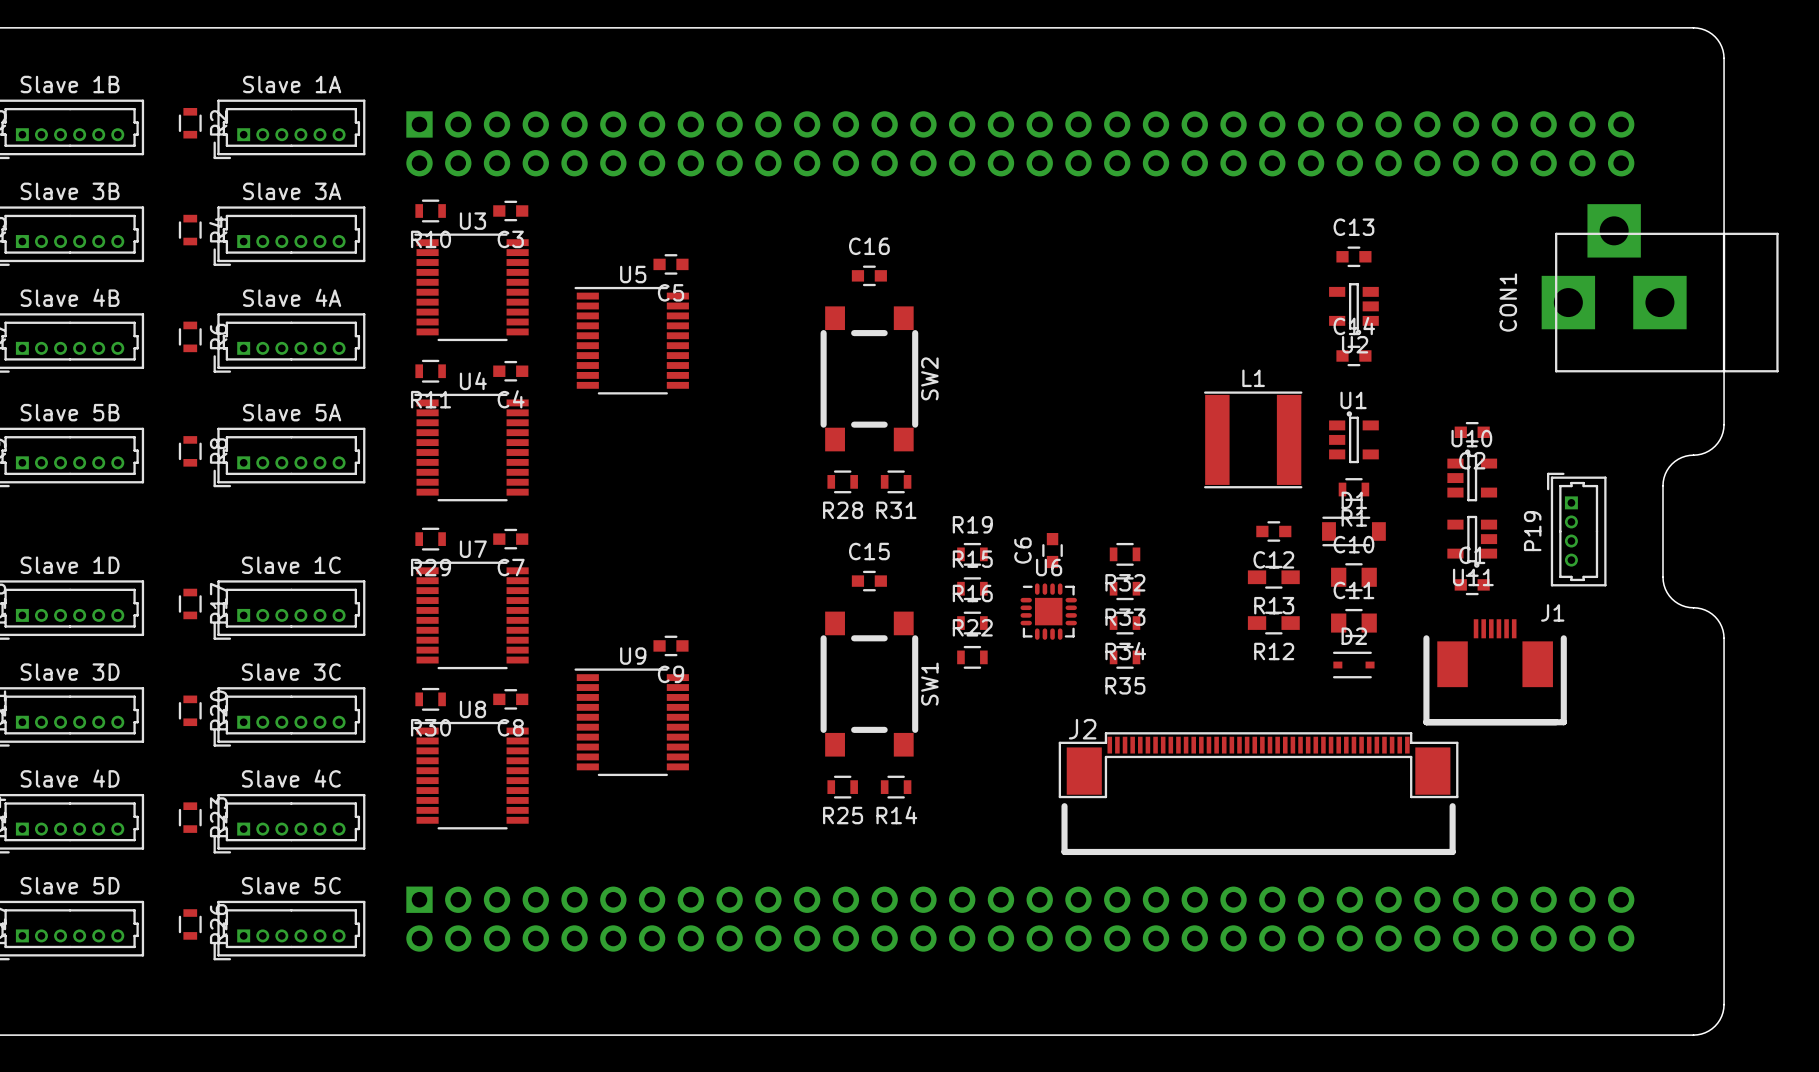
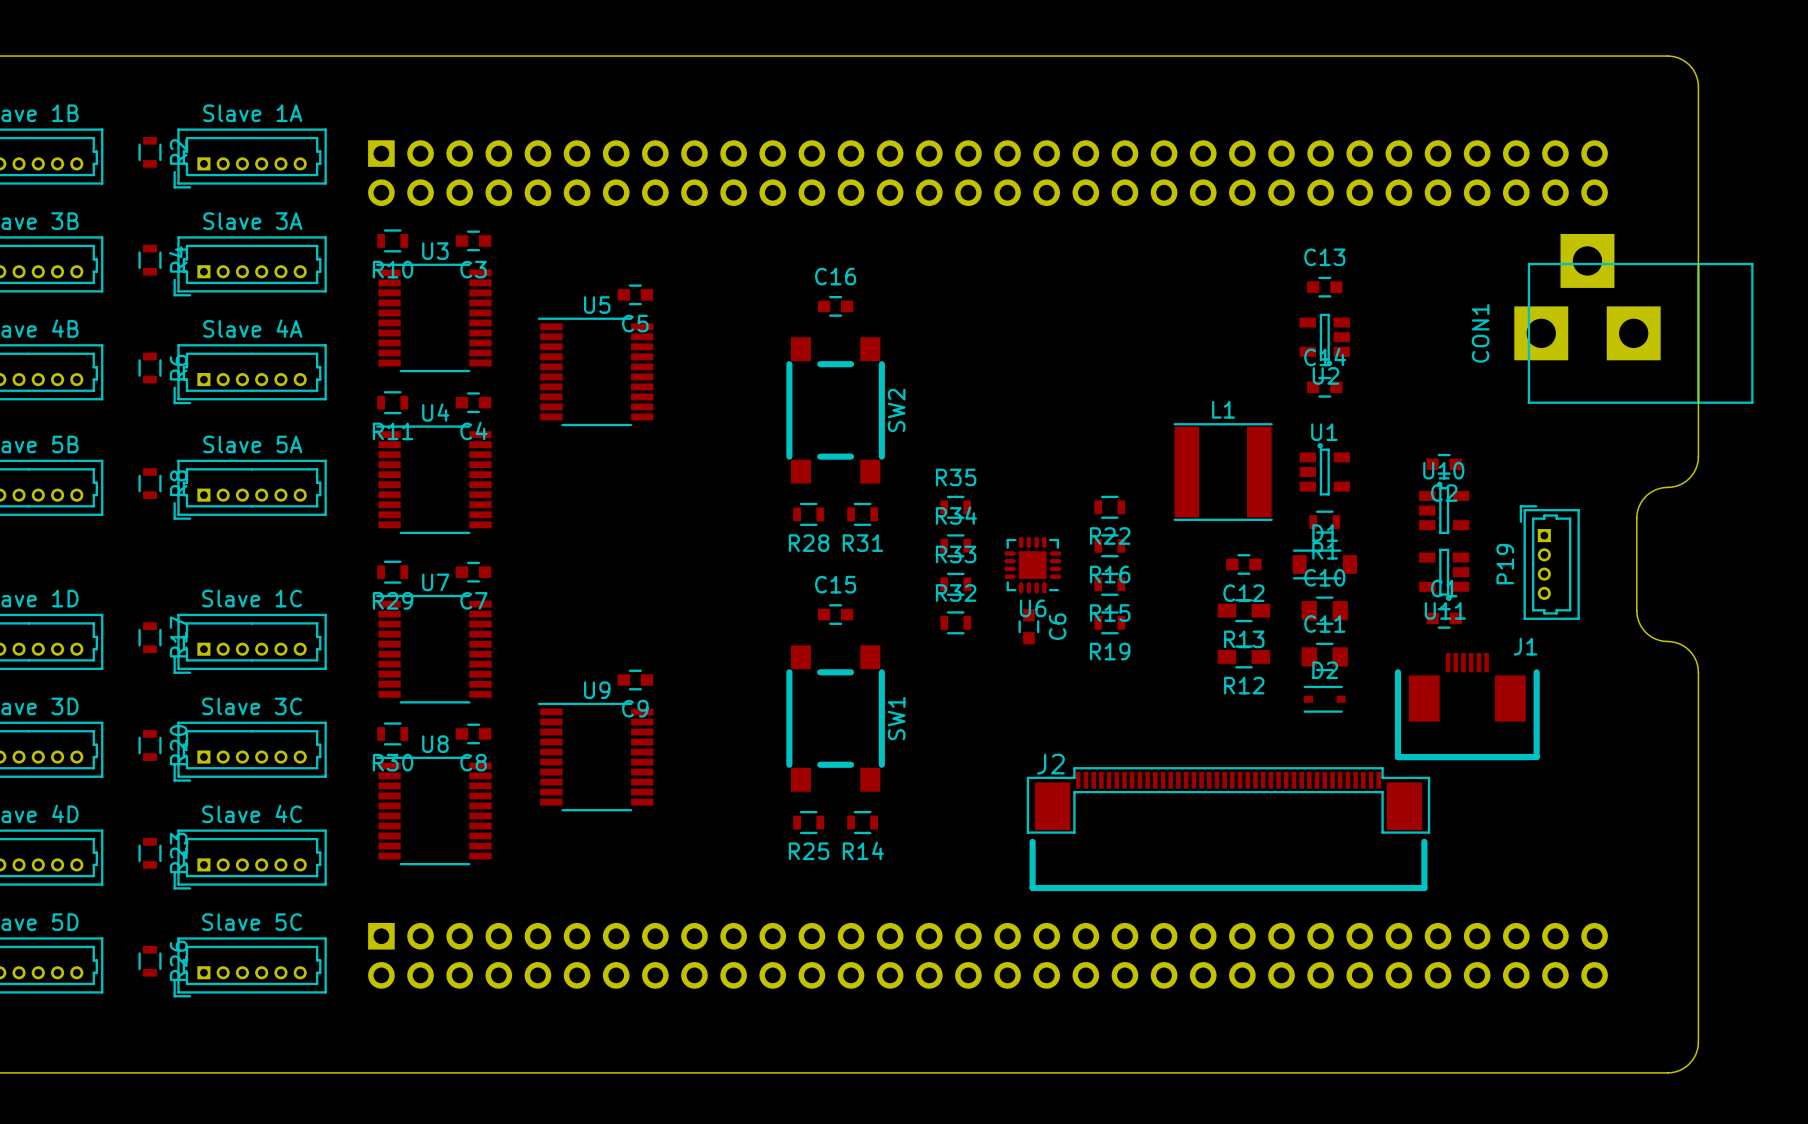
R19 name position: R19 (972, 524) -> R19 (1110, 651)
C6 name position: C6 (1022, 550) -> C6 (1057, 626)
C6 position: (1052, 550) -> (1028, 626)
R19 position: (972, 554) -> (1109, 622)
R32 position: (1125, 554) -> (955, 622)
R15 name position: R15 (972, 559) -> R15 (1110, 613)
R32 name position: R32 (1125, 582) -> R32 (956, 593)
R15 position: (972, 588) -> (1109, 584)
R33 position: (1125, 588) -> (955, 584)
R16 name position: R16 (972, 593) -> R16 (1110, 574)
U6 rotation: 0° (1048, 611) -> 180° (1032, 565)
U6 position: (1048, 611) -> (1032, 565)
R33 name position: R33 (1125, 617) -> R33 (956, 554)
R16 position: (972, 623) -> (1109, 545)
R34 position: (1125, 623) -> (955, 545)
R22 name position: R22 (972, 627) -> R22 (1110, 535)
R34 name position: R34 (1125, 651) -> R34 (956, 515)
R22 position: (972, 657) -> (1109, 507)
R35 position: (1125, 657) -> (955, 507)
R35 name position: R35 (1125, 685) -> R35 (956, 477)

